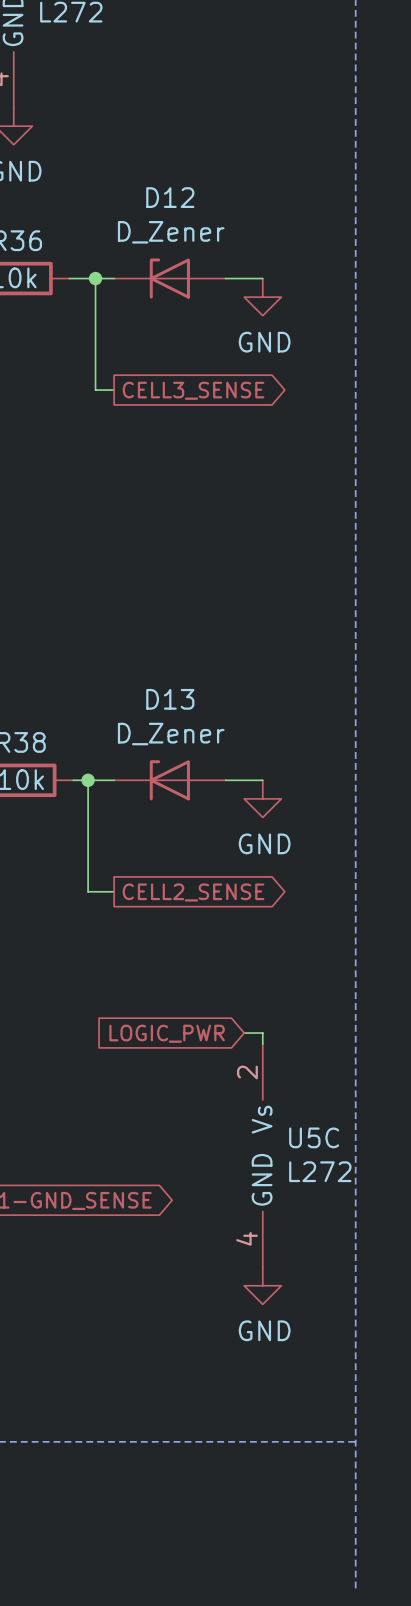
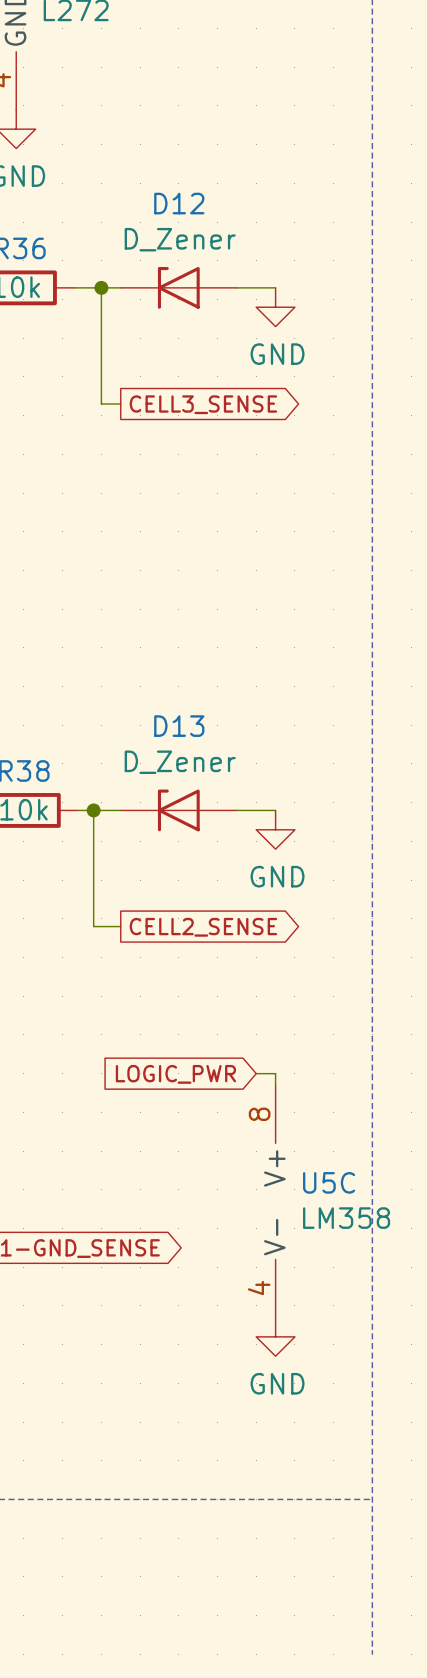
U5C pin number: 2 (247, 1072) -> 8 (259, 1114)
U5C pin name: Vs (262, 1119) -> V+ (274, 1168)
U5C value: L272 (320, 1171) -> LM358 (346, 1218)
U5C pin name: GND (262, 1179) -> V- (274, 1237)

